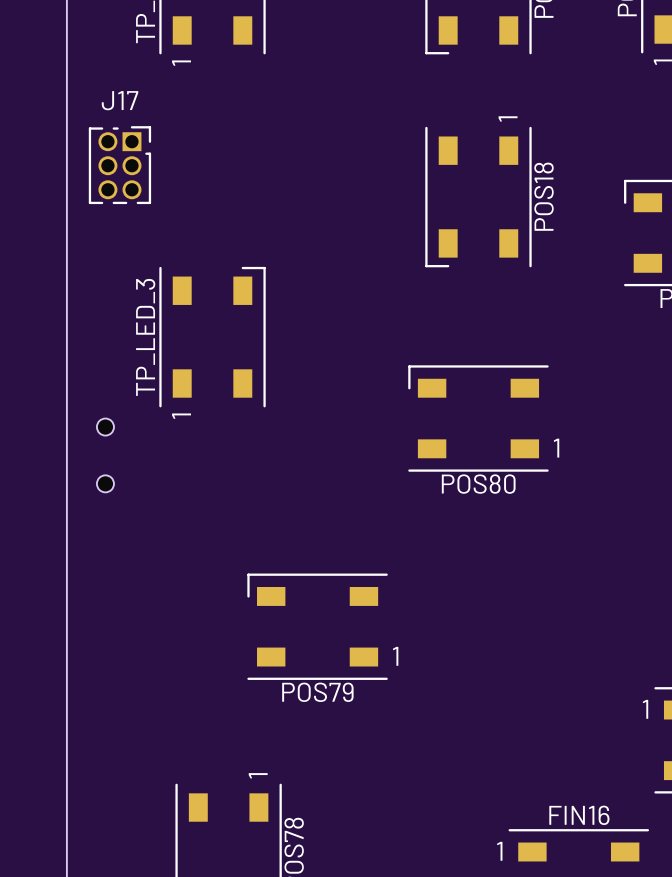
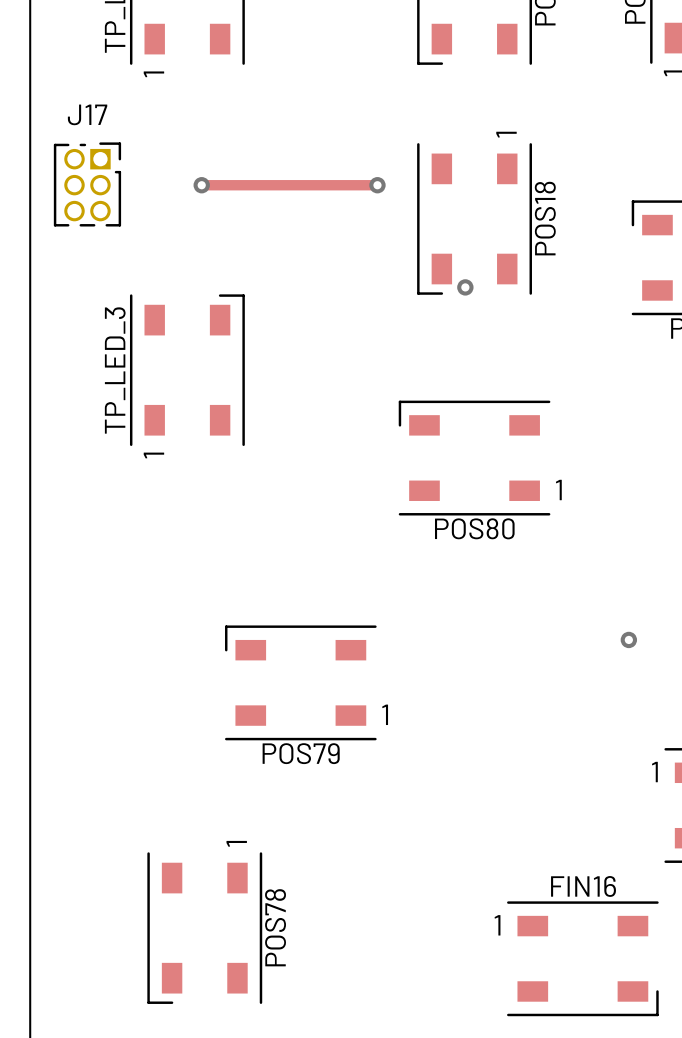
track: none -> (201, 185) (377, 185)
via: none -> (201, 185)
via: none -> (377, 185)
via: none -> (465, 287)
part: (105, 455) -> none
via: none -> (628, 639)

